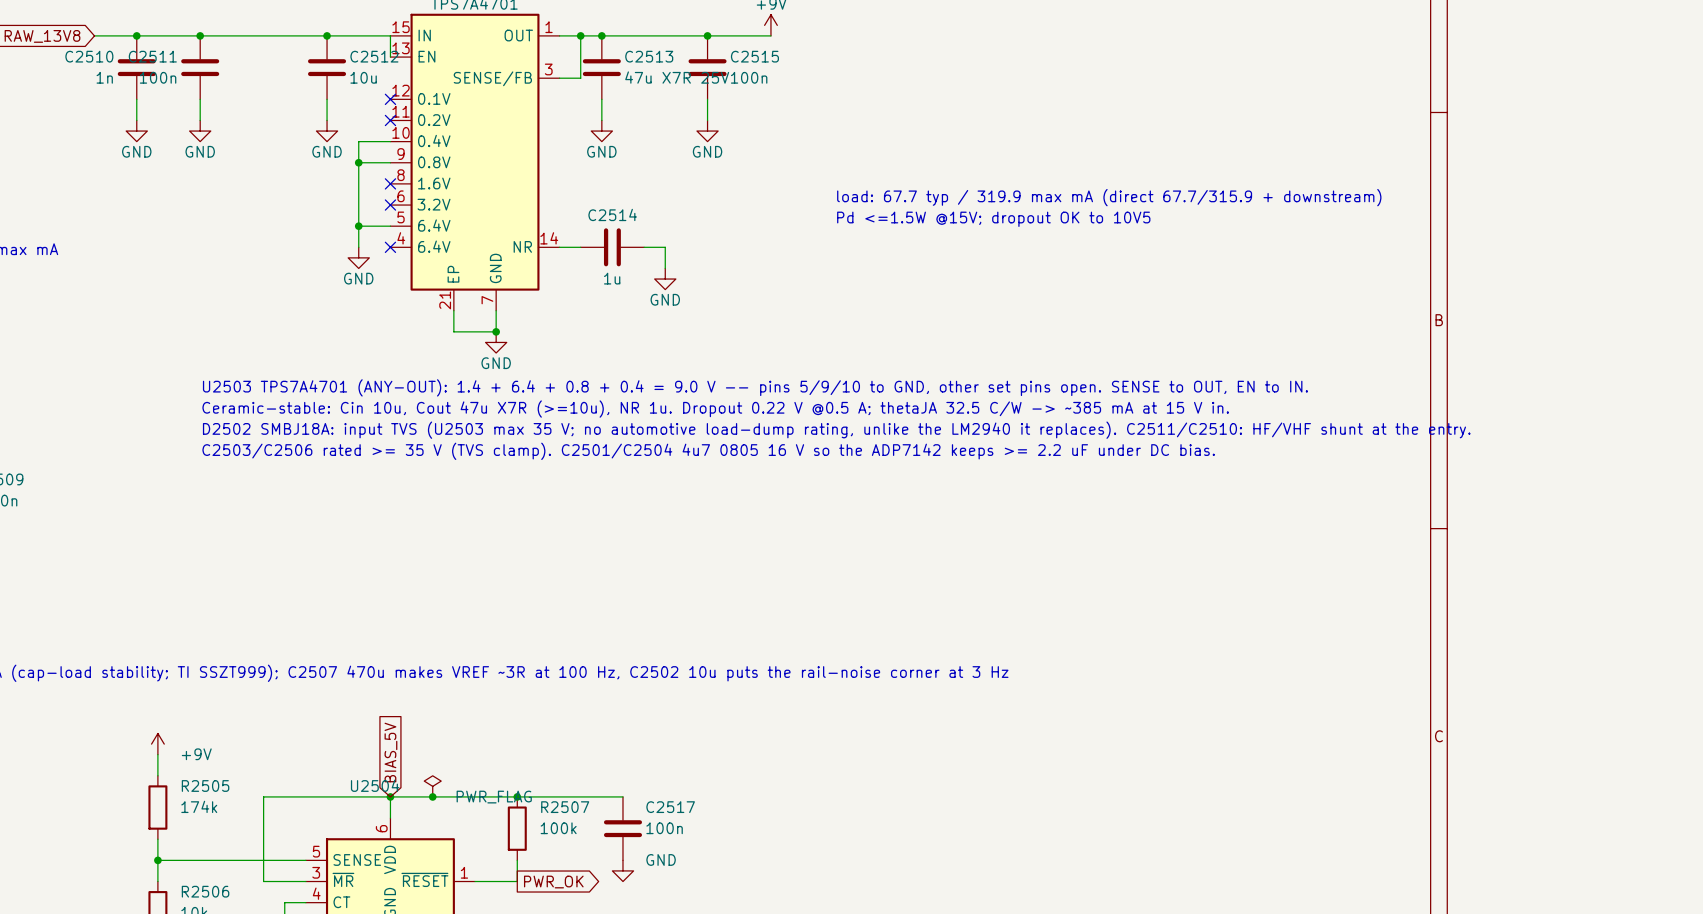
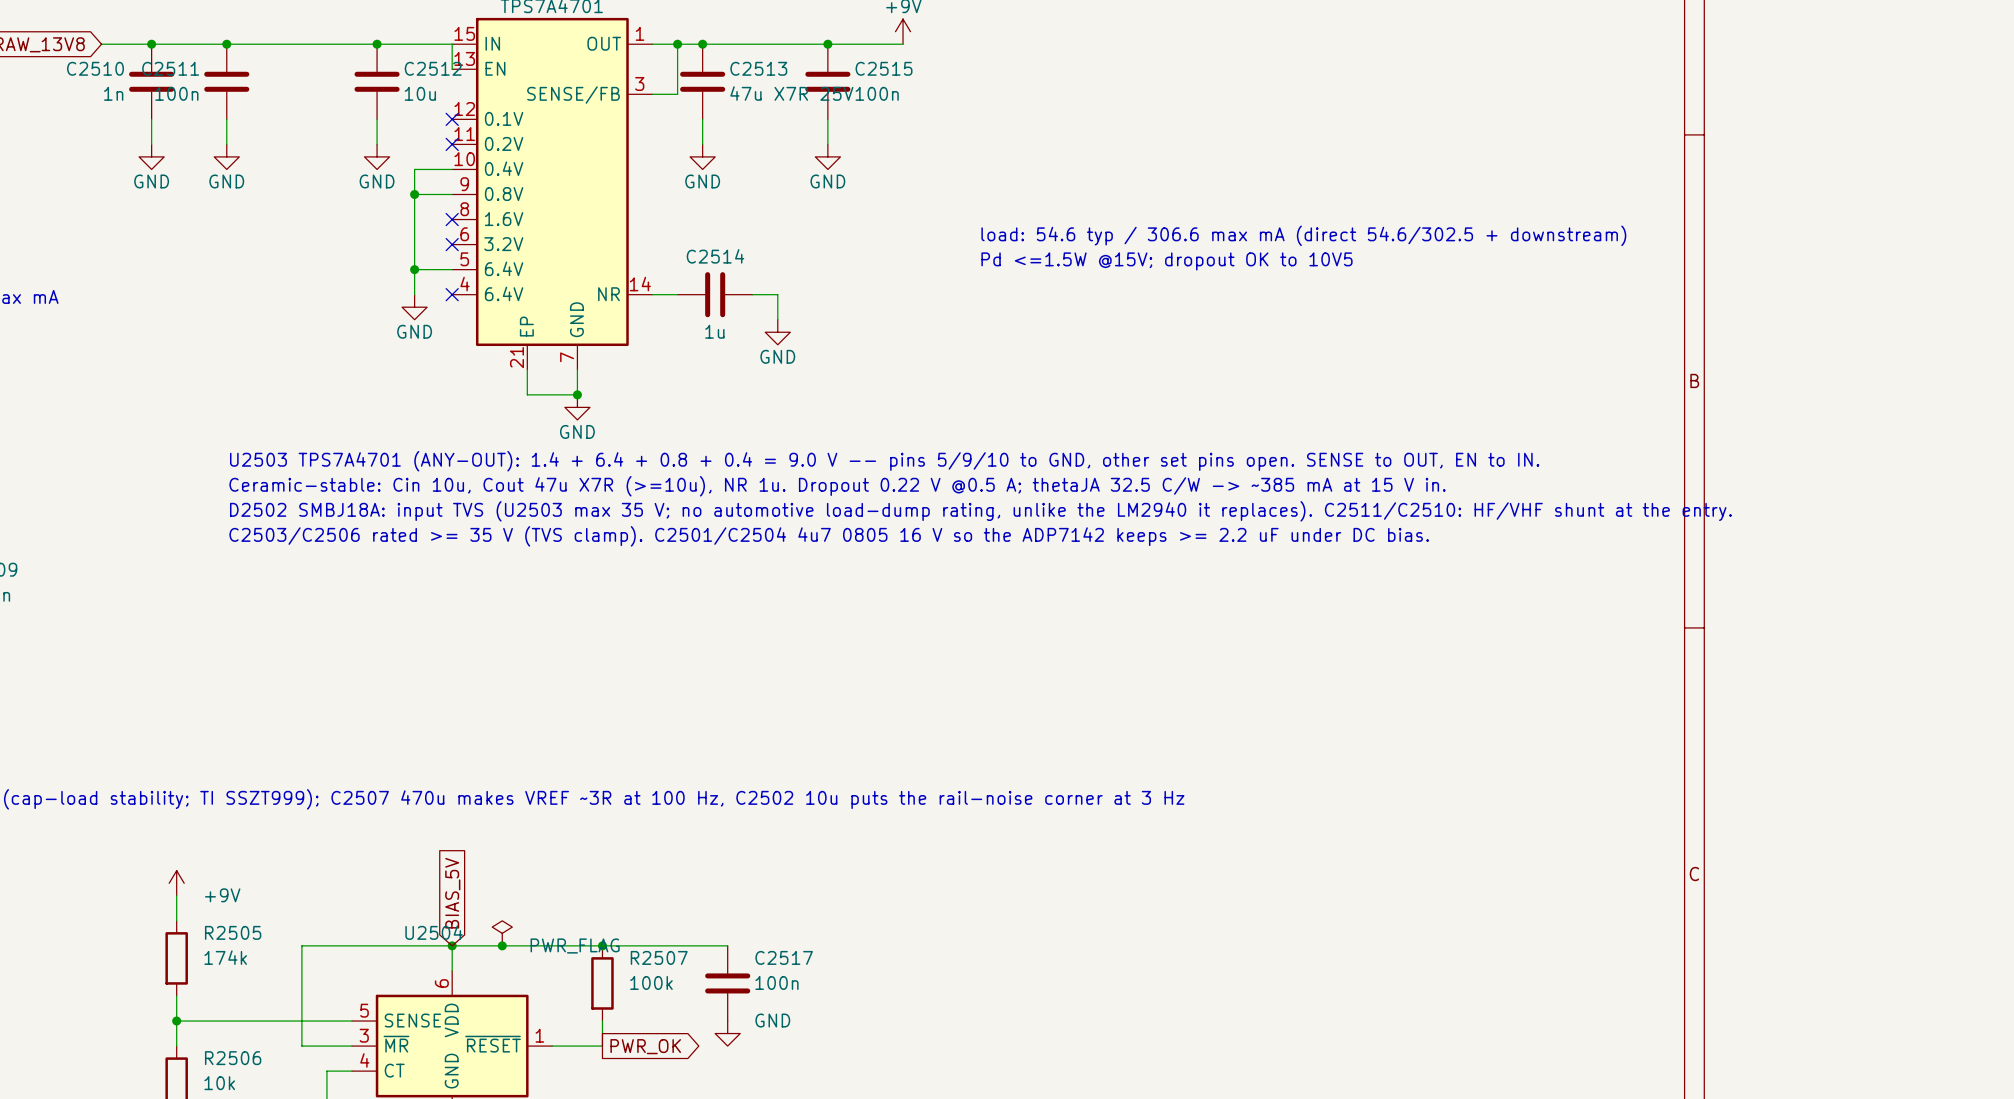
text: load: 67.7 typ / 319.9 max mA (direct 67.7/315.9 + downstream) (1109, 197) -> load: 54.6 typ / 306.6 max mA (direct 54.6/302.5 + downstream) (1303, 235)

